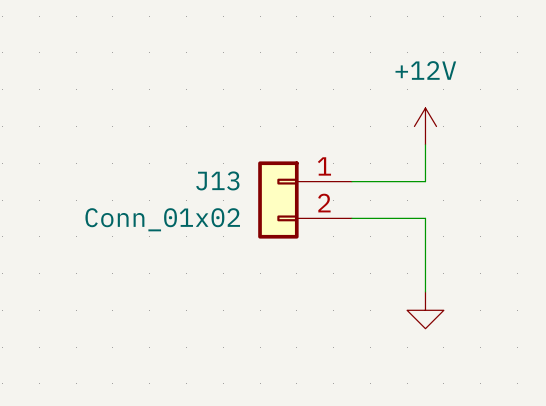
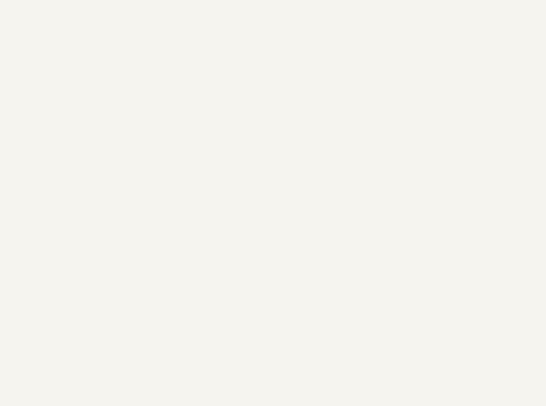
power symbol: +12V (425, 126) -> none
wire: (425, 144) (425, 181) (351, 181) -> none
J13: Conn_01x02 (305, 200) -> none
wire: (351, 218) (425, 218) (425, 291) -> none
power symbol: (425, 310) -> none

